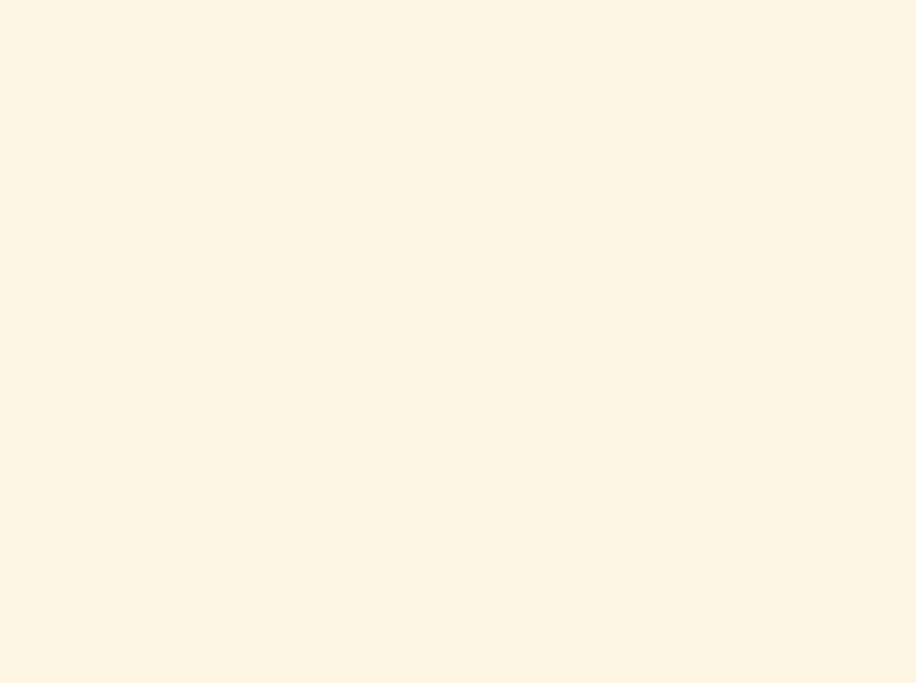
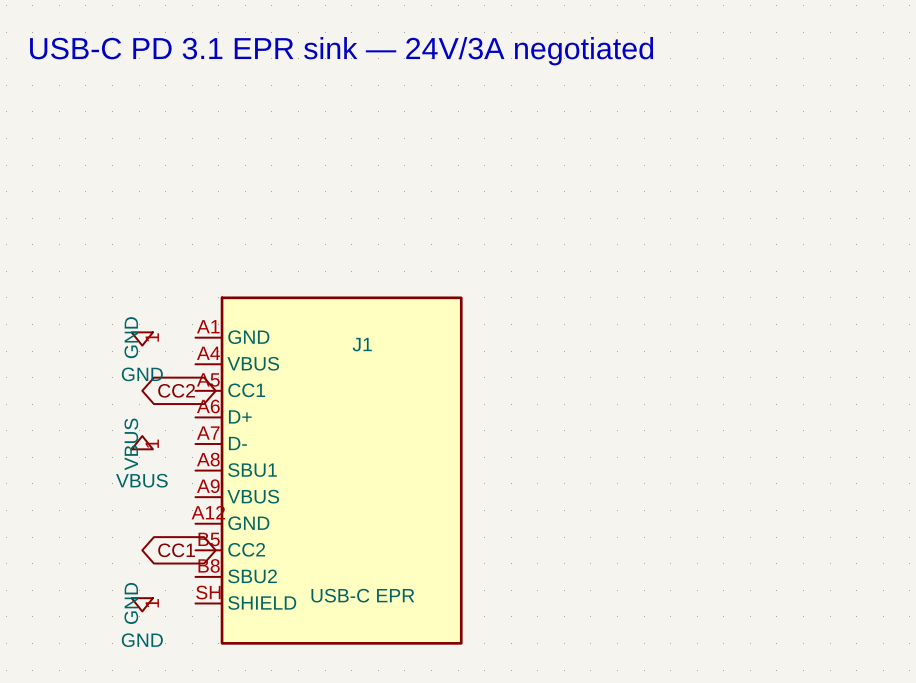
text: none -> USB-C PD 3.1 EPR sink — 24V/3A negotiated (341, 51)
power symbol: none -> GND (142, 339)
global label: none -> CC2 (176, 390)
power symbol: none -> VBUS (142, 442)
J1: none -> USB-C EPR (329, 470)
global label: none -> CC1 (176, 550)
power symbol: none -> GND (142, 604)

